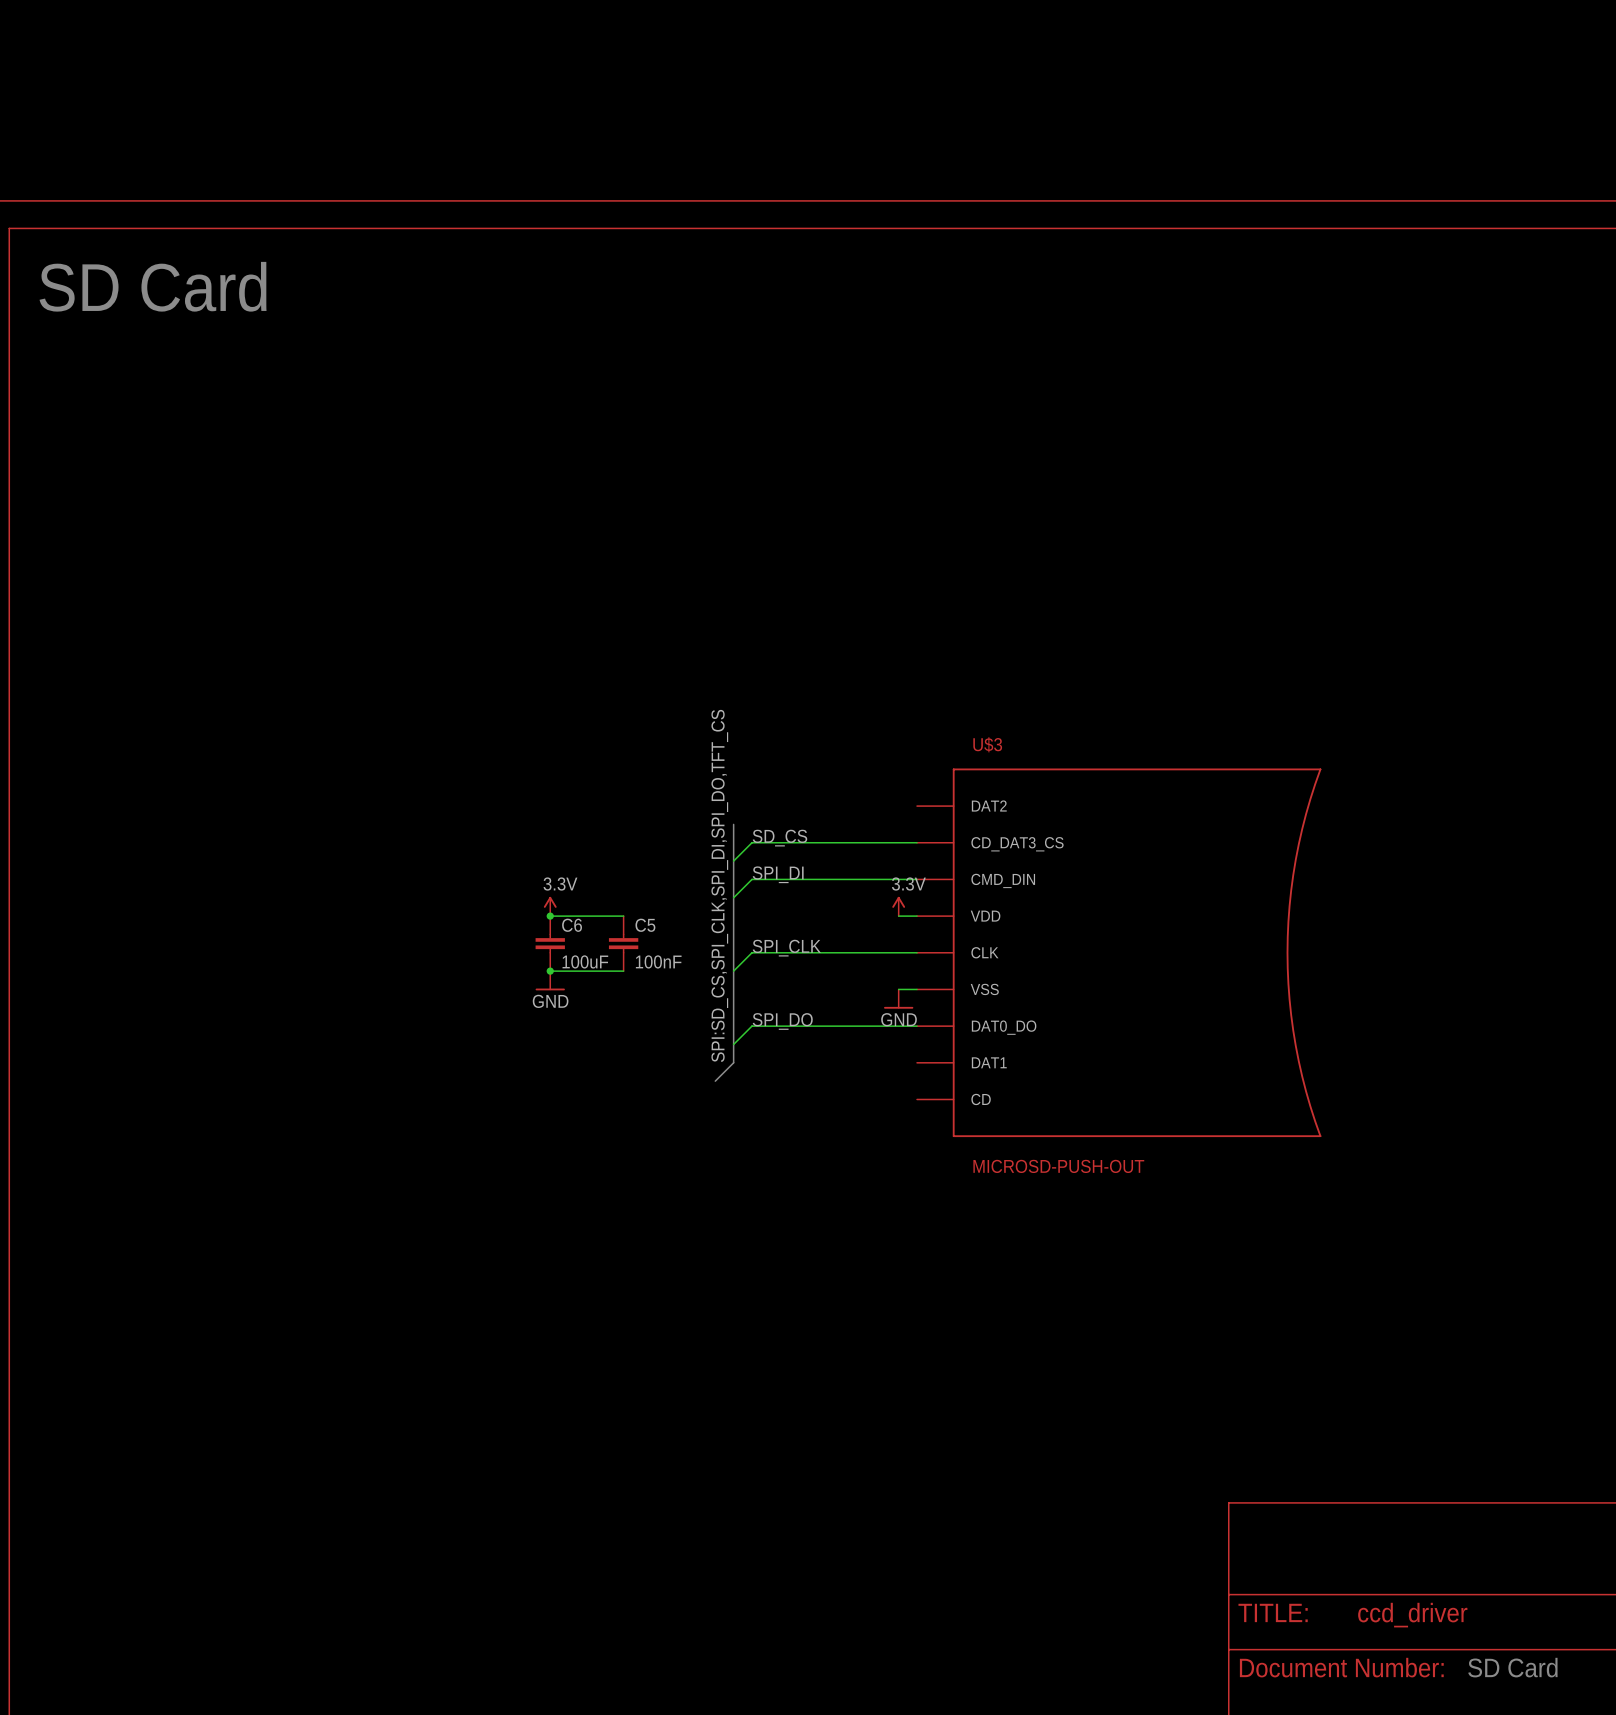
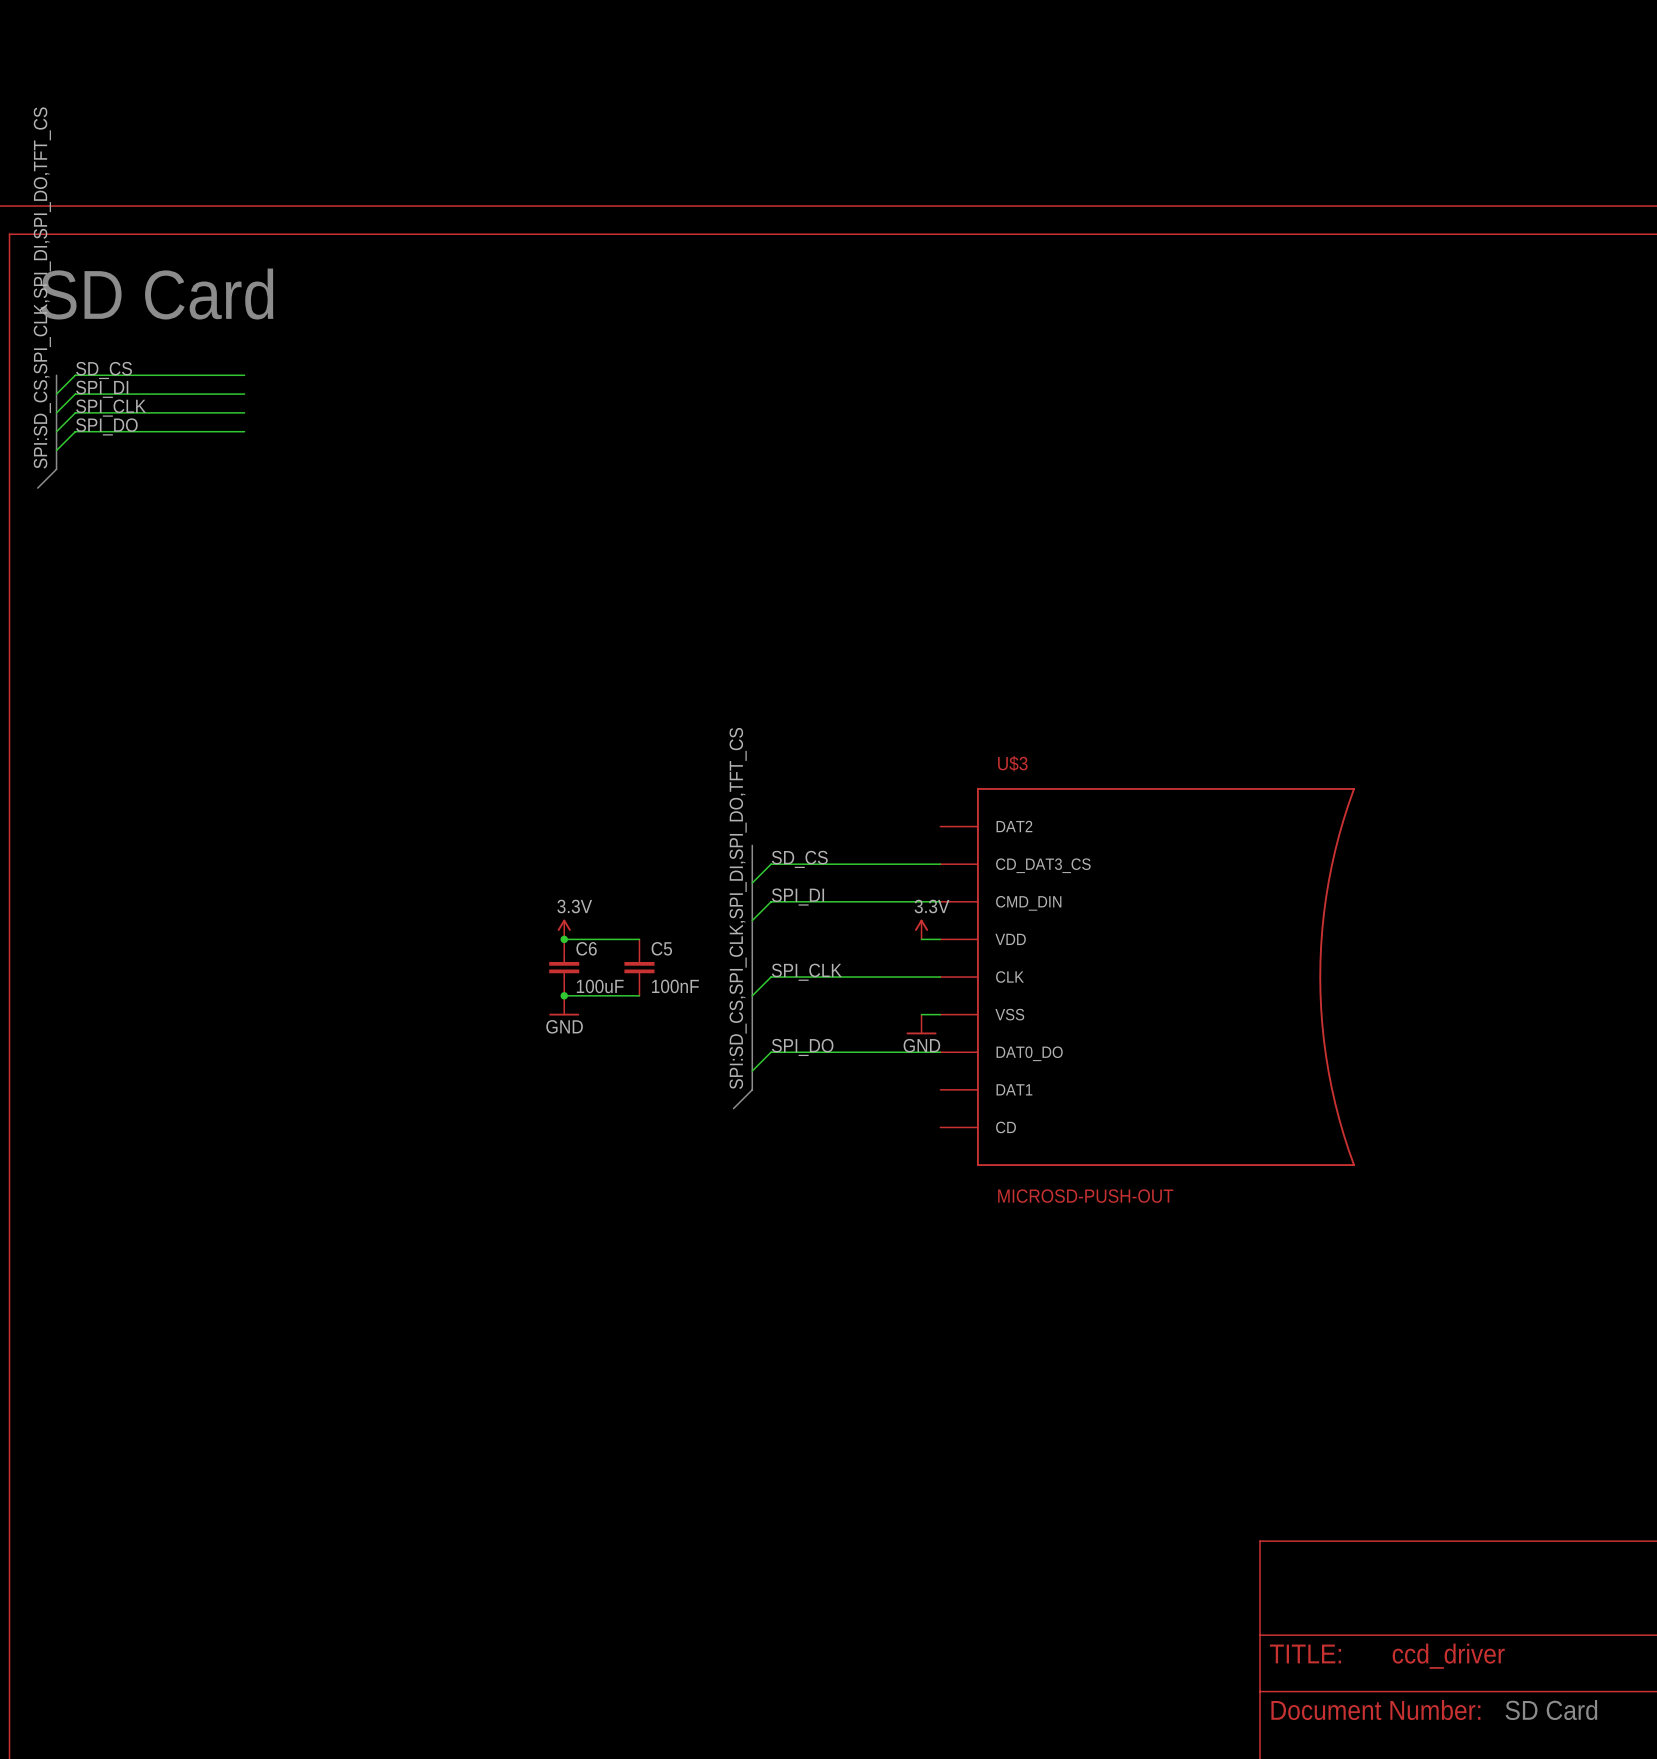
label: none -> SPI:SD_CS,SPI_CLK,SPI_DI,SPI_DO,TFT_CS (42, 287)
label: none -> SD_CS (104, 370)
bus: none -> (56, 375) (56, 469) (37, 488)
wire: none -> (244, 375) (75, 375) (56, 394)
label: none -> SPI_DI (102, 389)
wire: none -> (244, 394) (75, 394) (56, 412)
label: none -> SPI_CLK (111, 408)
wire: none -> (244, 412) (75, 412) (56, 431)
label: none -> SPI_DO (106, 426)
wire: none -> (244, 431) (75, 431) (56, 450)

